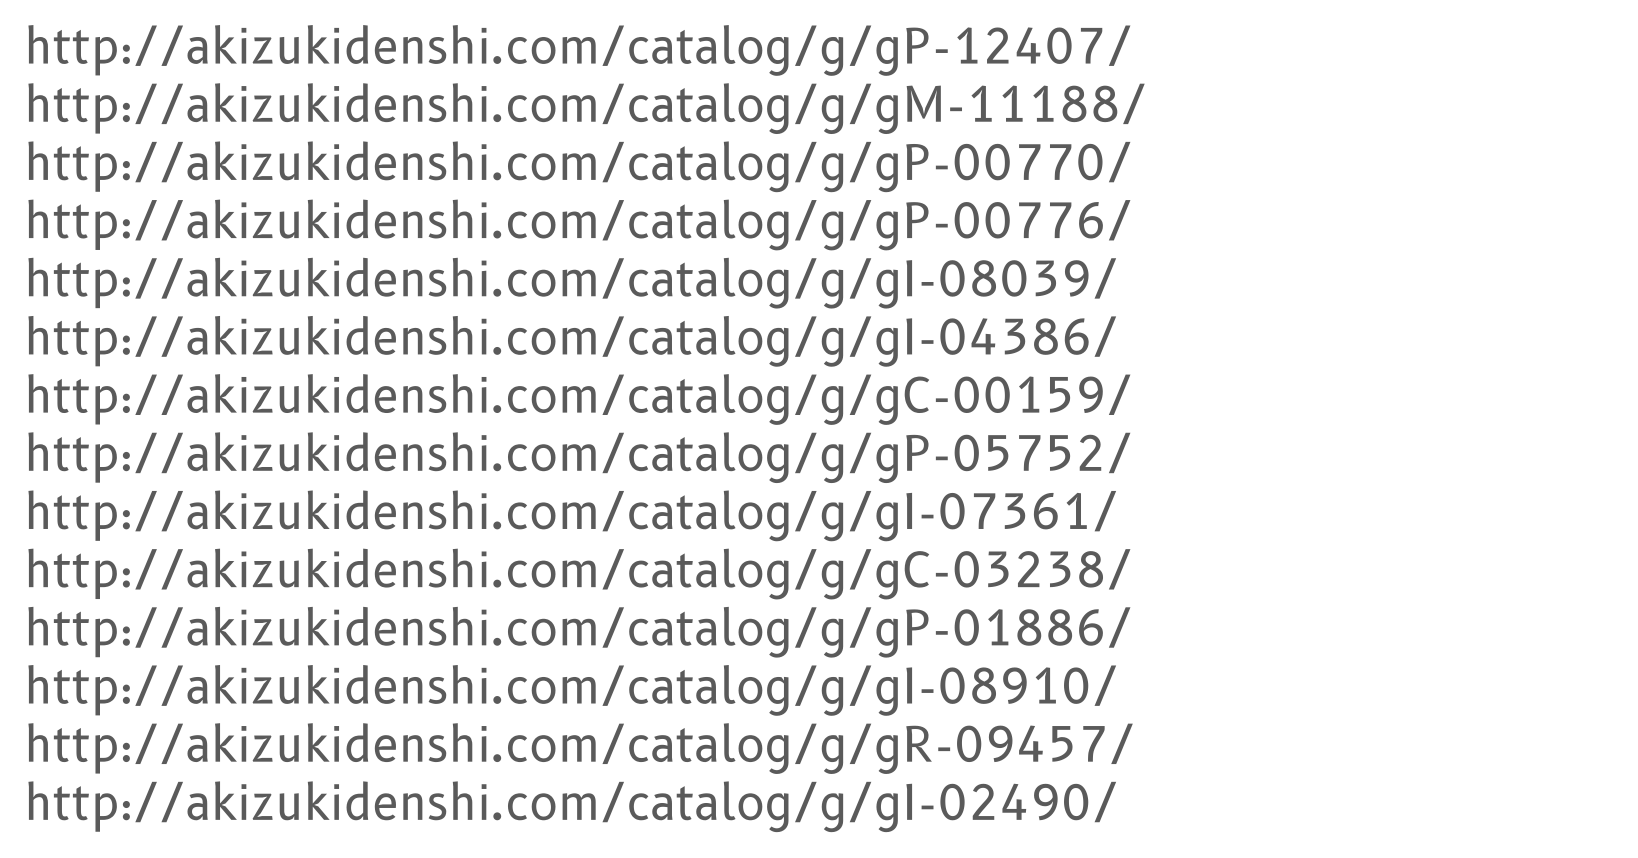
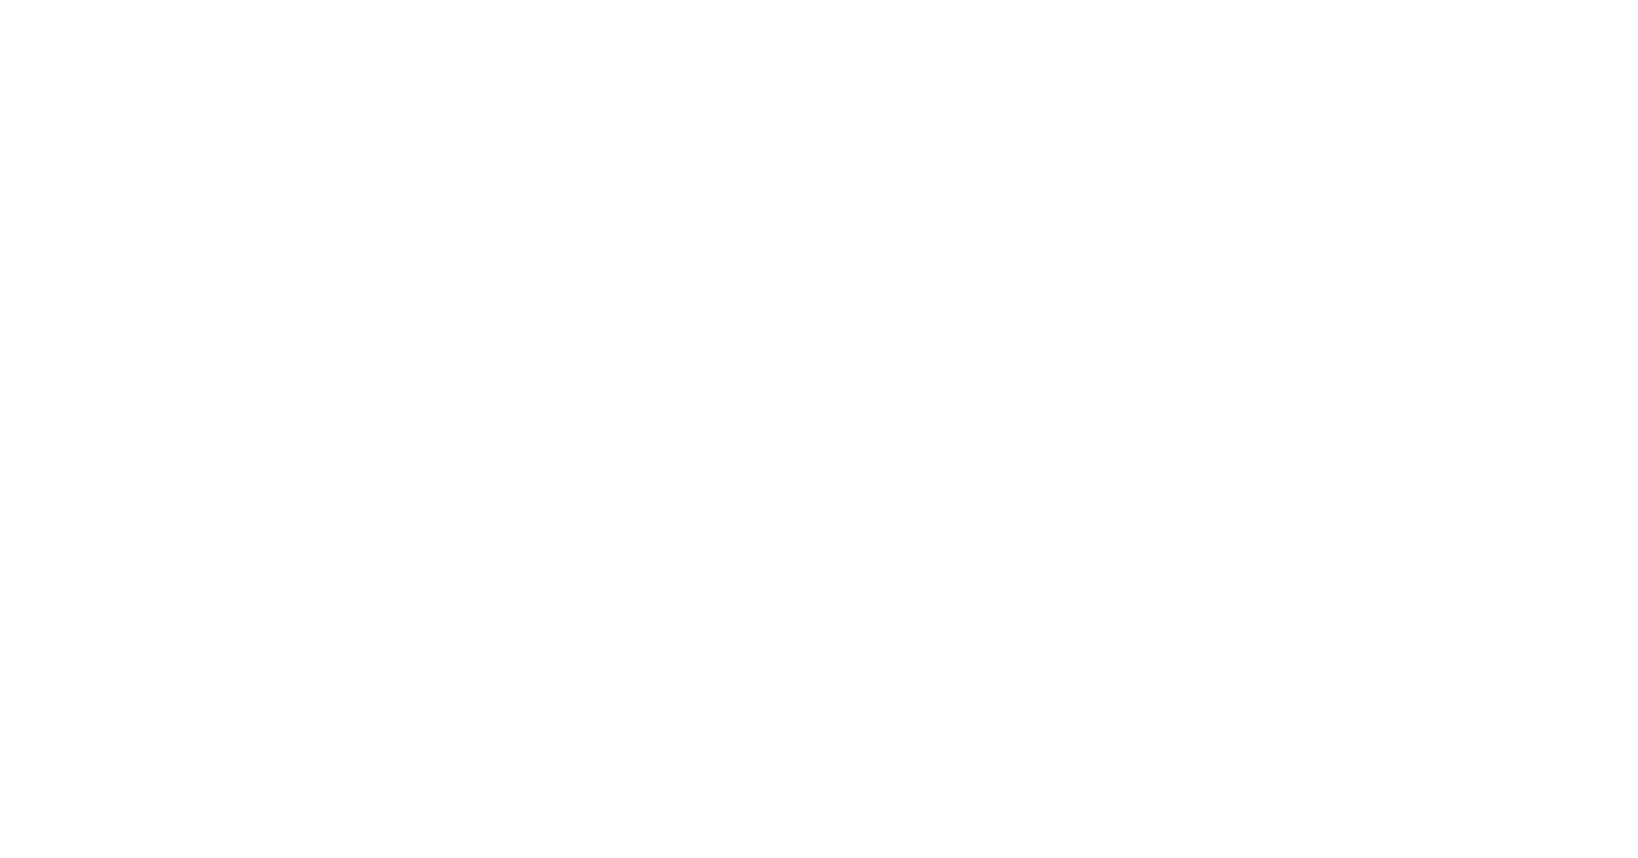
text: http://akizukidenshi.com/catalog/g/gP-12407/ (579, 50) -> none
text: http://akizukidenshi.com/catalog/g/gM-11188/ (586, 108) -> none
text: http://akizukidenshi.com/catalog/g/gP-00770/ (579, 166) -> none
text: http://akizukidenshi.com/catalog/g/gP-00776/ (579, 224) -> none
text: http://akizukidenshi.com/catalog/g/gI-08039/ (572, 283) -> none
text: http://akizukidenshi.com/catalog/g/gI-04386/ (572, 341) -> none
text: http://akizukidenshi.com/catalog/g/gC-00159/ (579, 399) -> none
text: http://akizukidenshi.com/catalog/g/gP-05752/ (579, 457) -> none
text: http://akizukidenshi.com/catalog/g/gI-07361/ (572, 515) -> none
text: http://akizukidenshi.com/catalog/g/gC-03238/ (579, 574) -> none
text: http://akizukidenshi.com/catalog/g/gP-01886/ (579, 632) -> none
text: http://akizukidenshi.com/catalog/g/gI-08910/ (572, 690) -> none
text: http://akizukidenshi.com/catalog/g/gR-09457/ (580, 748) -> none
text: http://akizukidenshi.com/catalog/g/gI-02490/ (572, 806) -> none

